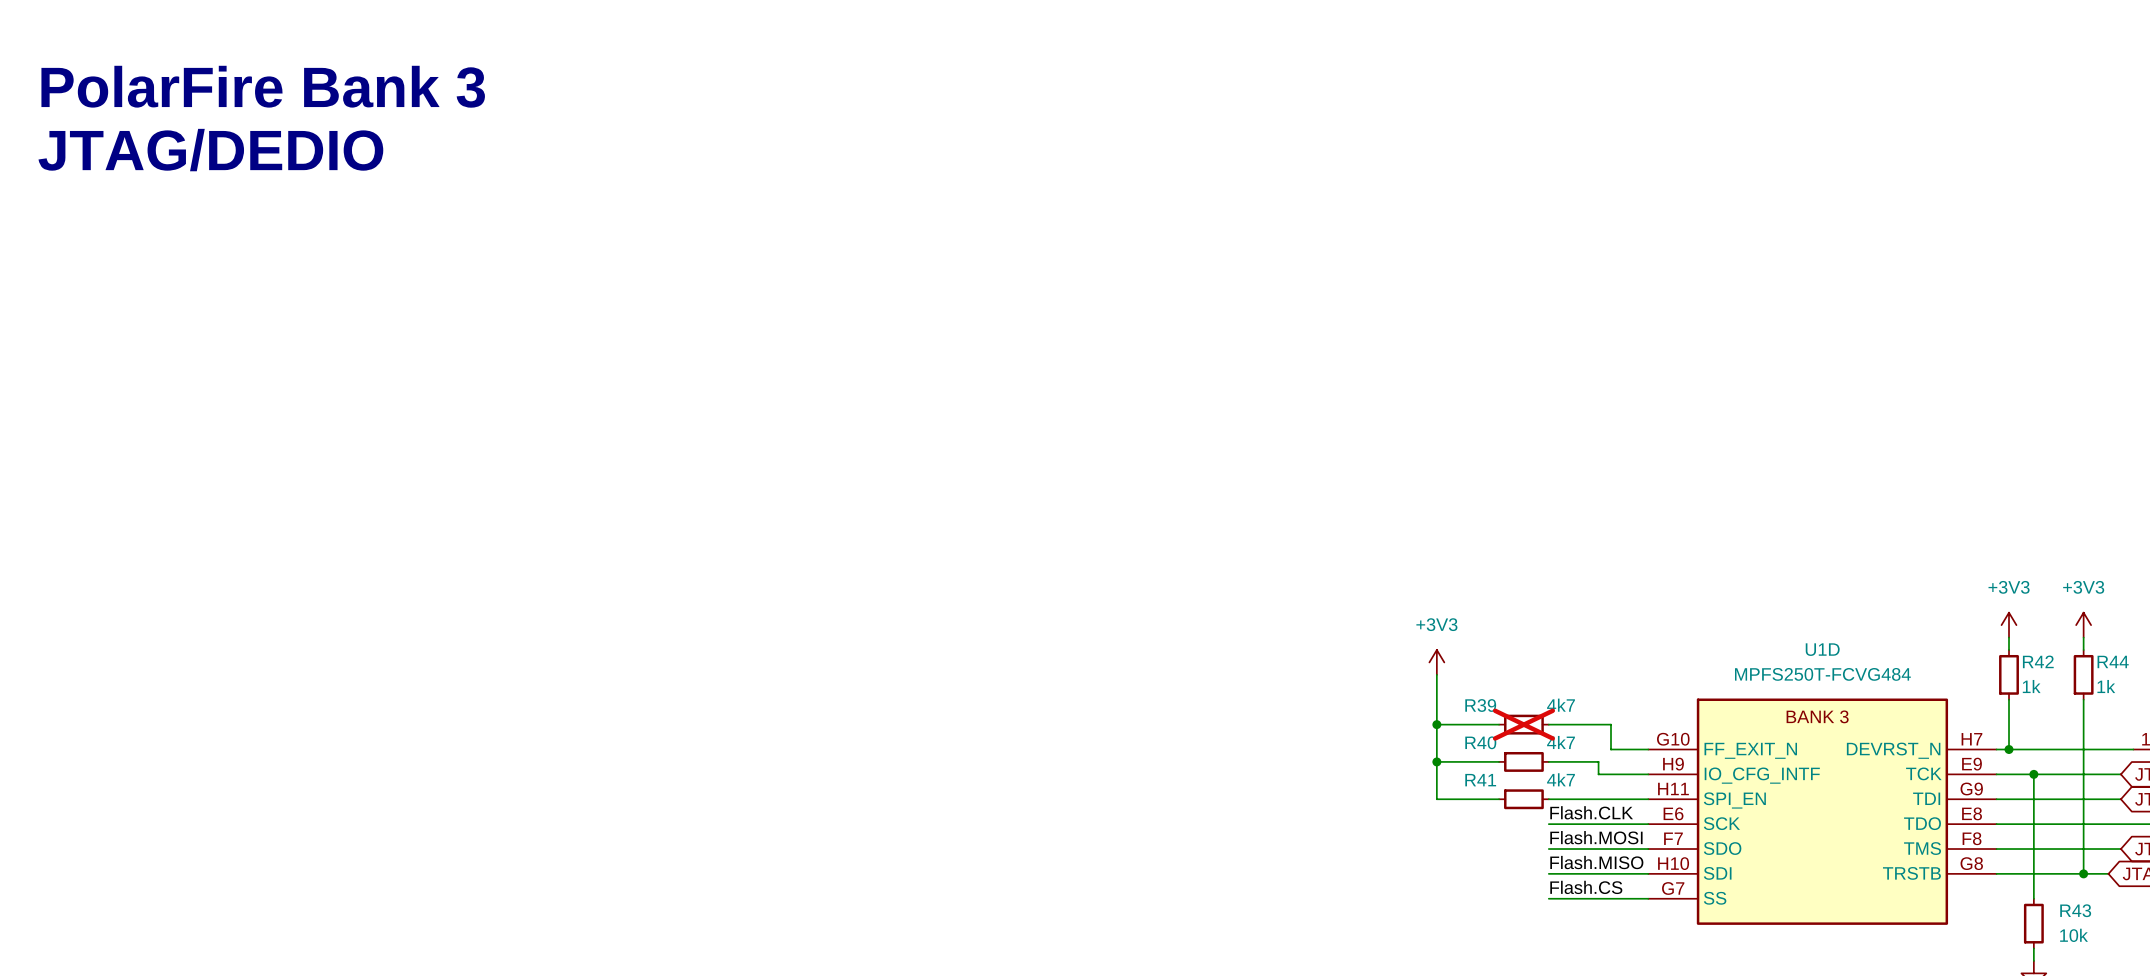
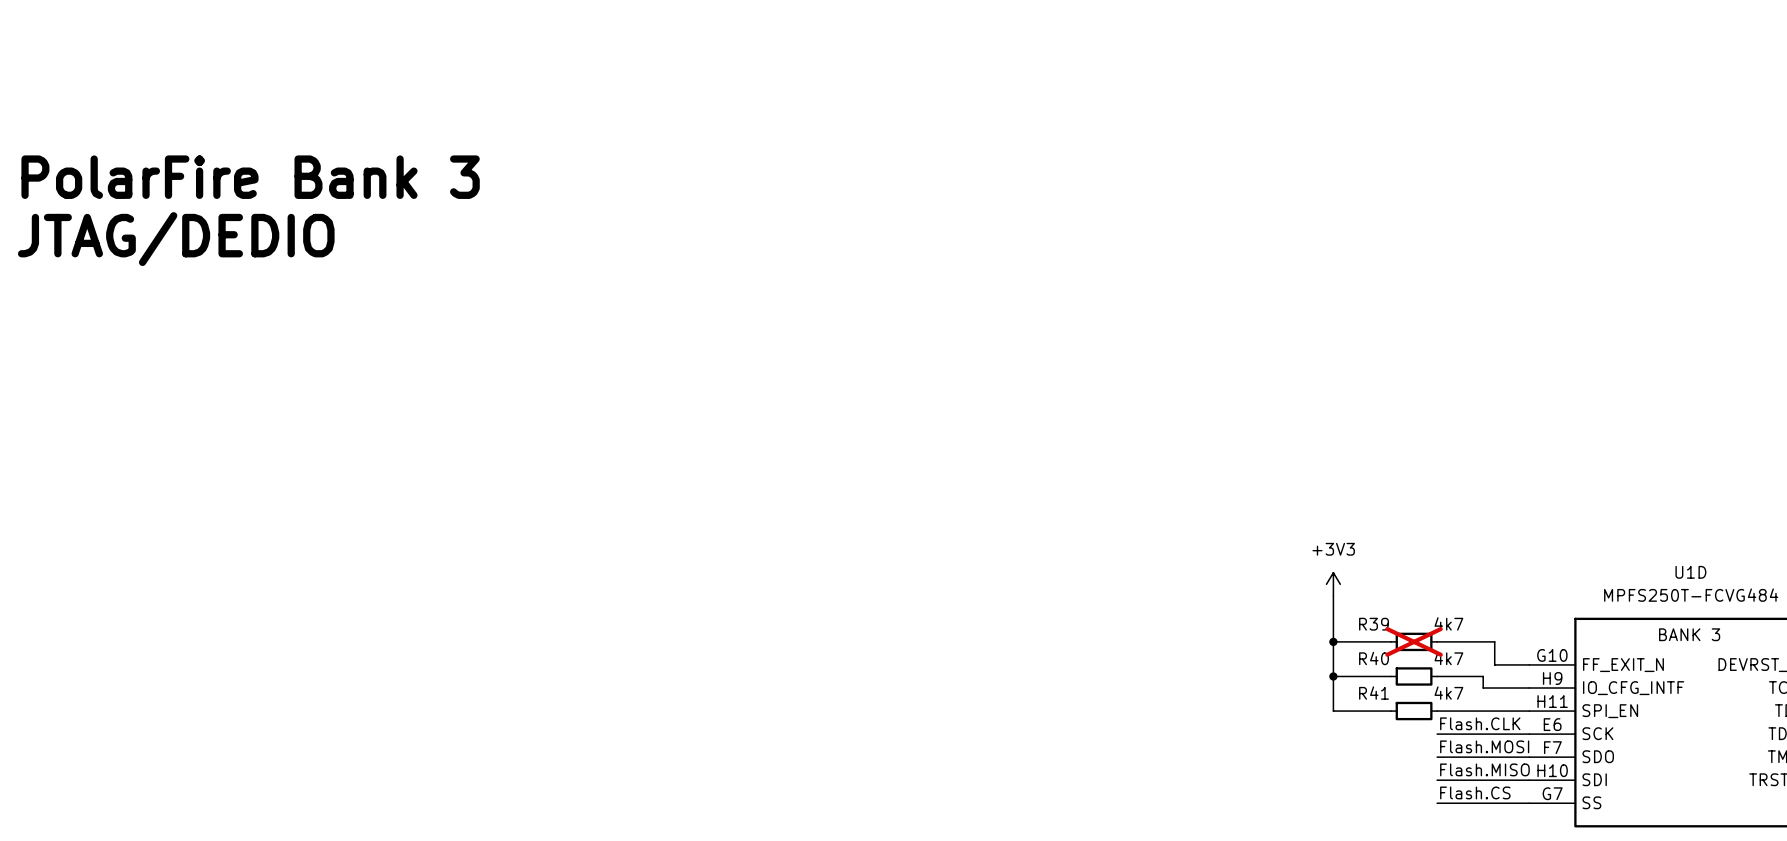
text position: PolarFire Bank 3 (263, 86) -> PolarFire Bank 3 (250, 177)
text position: JTAG/DEDIO (210, 150) -> JTAG/DEDIO (176, 239)

